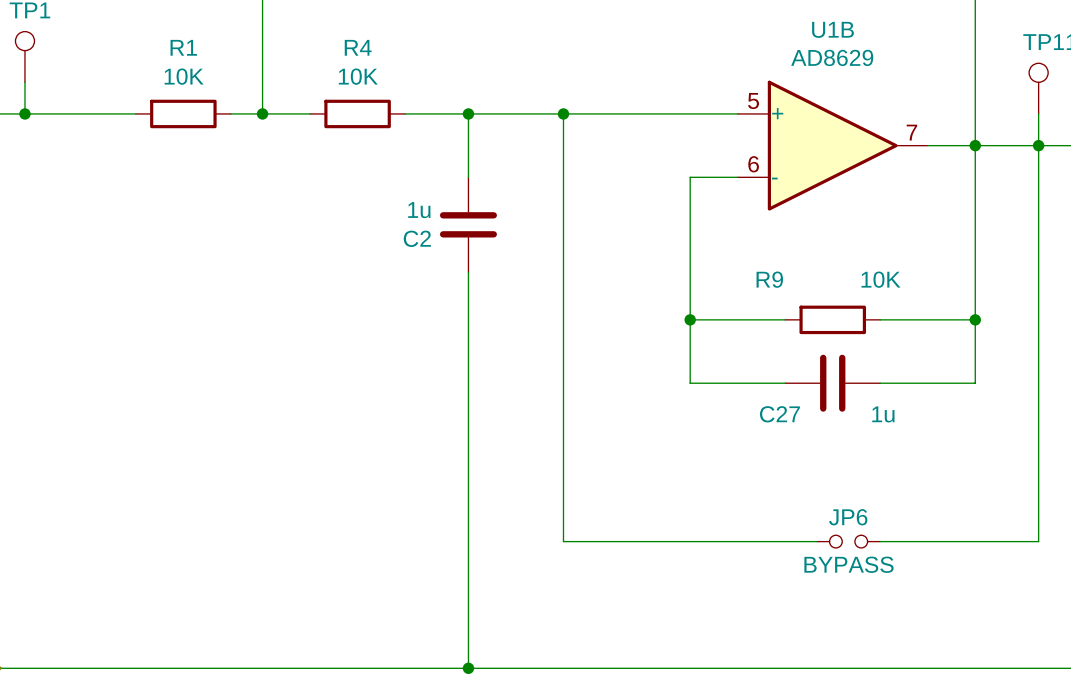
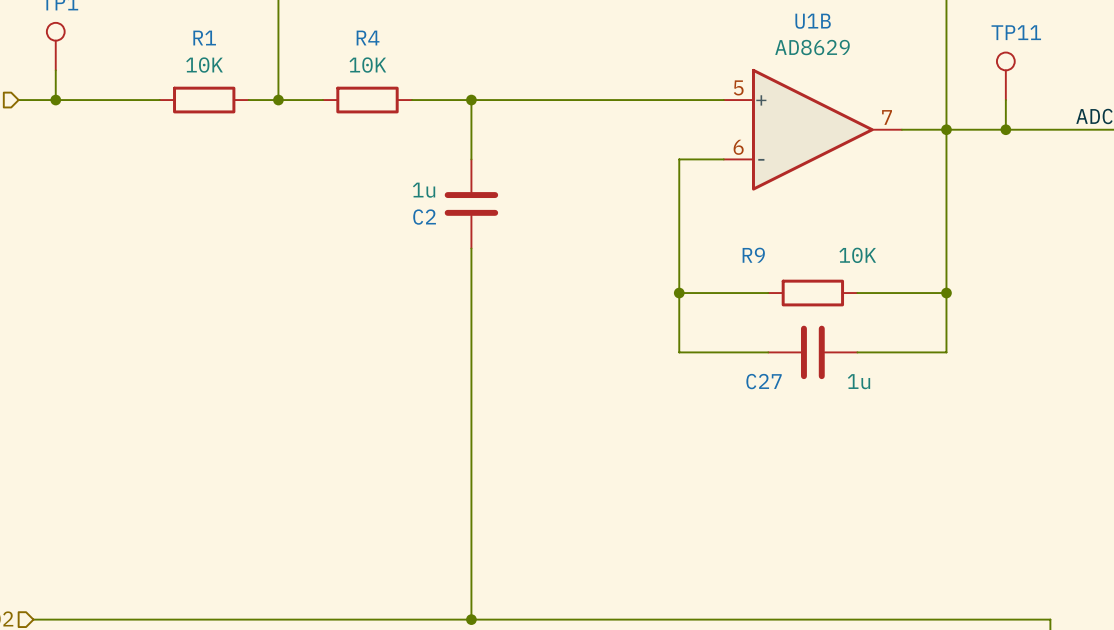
wire: (563, 113) (563, 541) (816, 541) -> none
junction: (563, 113) -> none
wire: (1038, 145) (1038, 541) (880, 541) -> none
JP6: BYPASS (848, 541) -> none

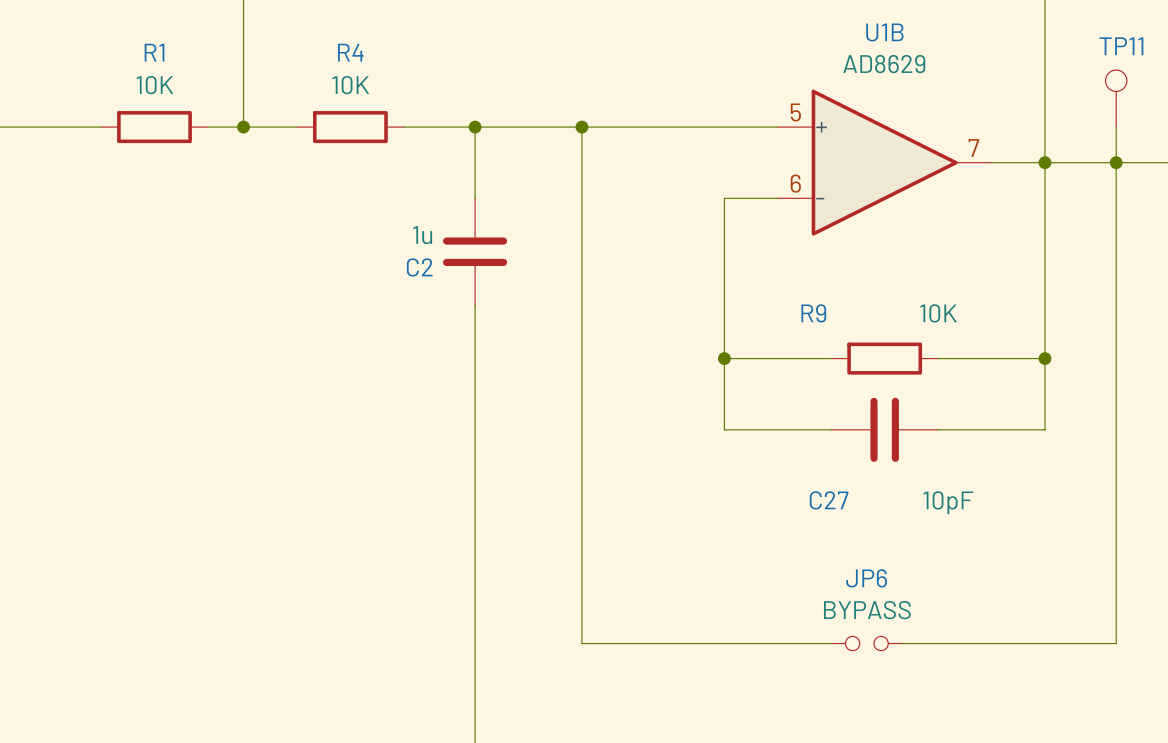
wire: none -> (581, 127) (581, 643) (831, 643)
junction: none -> (581, 127)
wire: none -> (1116, 162) (1116, 643) (902, 643)
C27 name position: C27 (764, 381) -> C27 (829, 500)
C27 value: 1u (859, 381) -> 10pF (948, 502)
JP6: none -> BYPASS (866, 643)

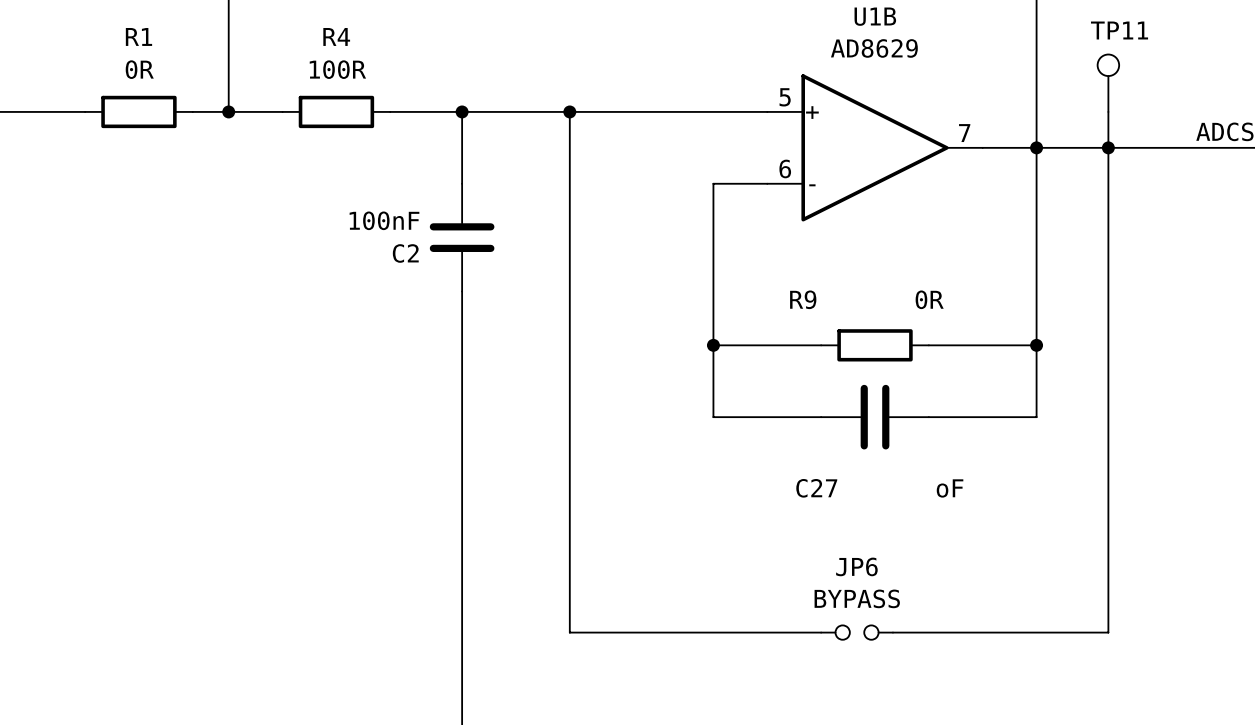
R1 value: 10K (154, 85) -> 0R (139, 69)
R4 value: 10K (350, 85) -> 100R (337, 69)
C2 value: 1u (422, 235) -> 100nF (384, 220)
R9 value: 10K (938, 313) -> 0R (929, 299)
C27 value: 10pF (948, 502) -> oF (950, 488)

